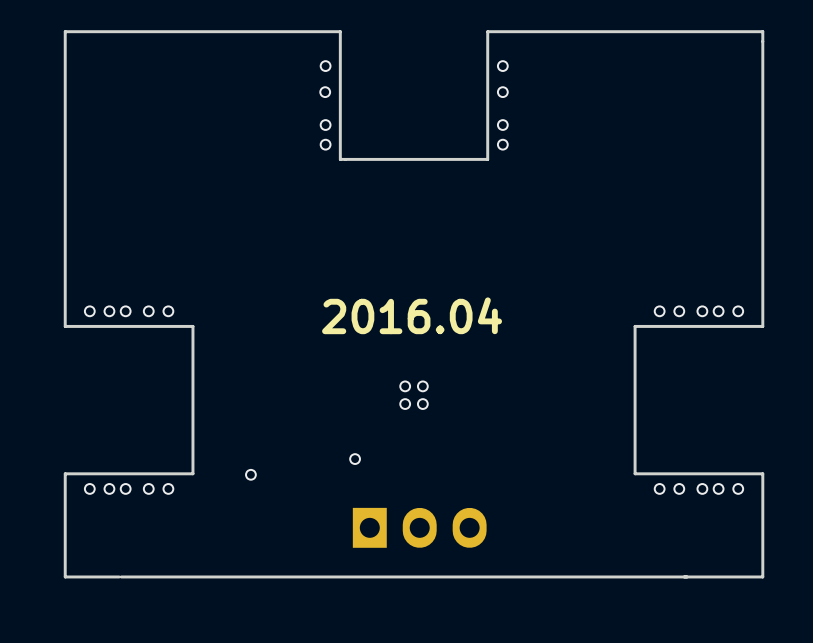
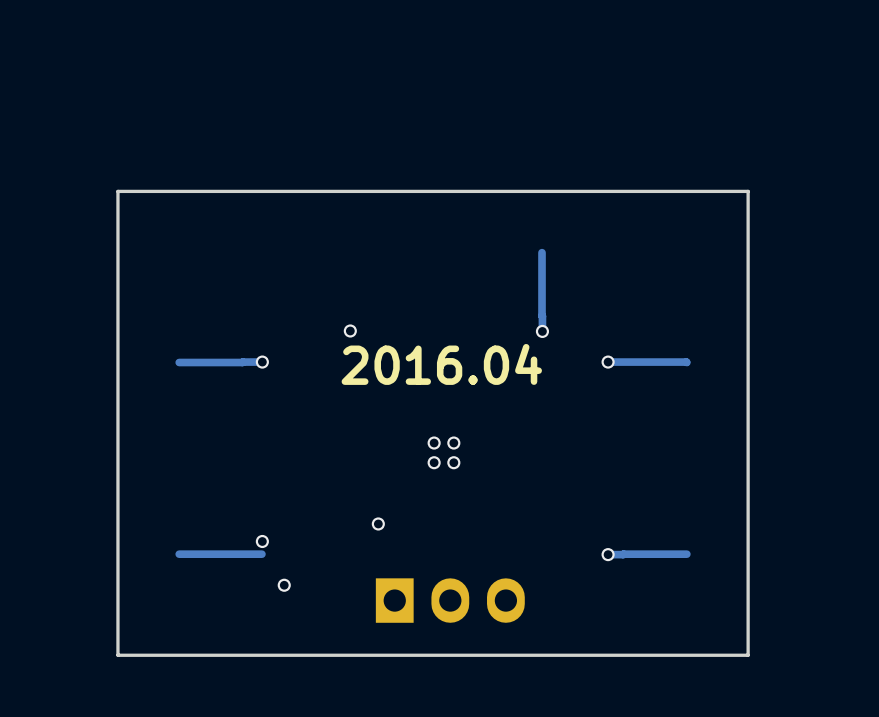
via: (325, 66) -> none
via: (502, 66) -> none
via: (325, 92) -> none
via: (502, 92) -> none
via: (325, 125) -> none
via: (502, 125) -> none
via: (325, 144) -> none
via: (502, 144) -> none
track: none -> (542, 252) (542, 331)
via: none -> (350, 330)
via: none -> (542, 331)
via: (89, 311) -> none
via: (109, 311) -> none
via: (125, 311) -> none
via: (148, 311) -> none
via: (168, 311) -> none
via: (659, 311) -> none
via: (679, 311) -> none
via: (702, 311) -> none
via: (718, 311) -> none
via: (738, 311) -> none
track: none -> (262, 362) (179, 362)
via: none -> (262, 362)
track: none -> (608, 362) (686, 362)
via: none -> (608, 362)
track: none -> (261, 554) (179, 554)
via: none -> (608, 554)
track: none -> (686, 554) (608, 554)
via: (89, 488) -> none
via: (109, 488) -> none
via: (125, 488) -> none
via: (148, 488) -> none
via: (168, 488) -> none
via: (659, 488) -> none
via: (679, 488) -> none
via: (702, 488) -> none
via: (718, 488) -> none
via: (738, 488) -> none
via: none -> (284, 585)
board edge: (687, 576) (762, 576) (762, 473) (635, 473) (635, 326) (762, 326) (762, 31) (487, 31) (487, 159) (340, 159) (340, 31) (65, 31) (65, 326) (192, 326) (192, 473) (65, 473) (65, 576) (119, 576) -> (748, 655) (748, 191) (117, 191) (117, 655)

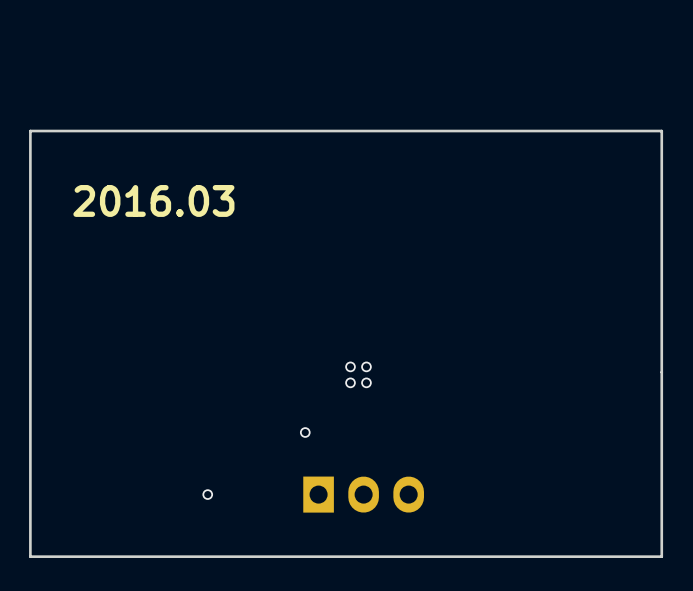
board edge: (748, 191) (748, 655) (117, 655) (117, 191) (748, 191) -> (661, 131) (661, 556) (30, 556) (30, 131) (661, 131)
text: none -> 2016.03 (153, 200)
track: (542, 252) (542, 331) -> none
via: (350, 330) -> none
via: (542, 331) -> none
track: (262, 362) (179, 362) -> none
via: (262, 362) -> none
track: (608, 362) (686, 362) -> none
via: (608, 362) -> none
text: 2016.04 (441, 364) -> none
via: (262, 541) -> none
track: (261, 554) (179, 554) -> none
via: (608, 554) -> none
track: (686, 554) (608, 554) -> none
via: (284, 585) -> none
via: none -> (207, 494)

